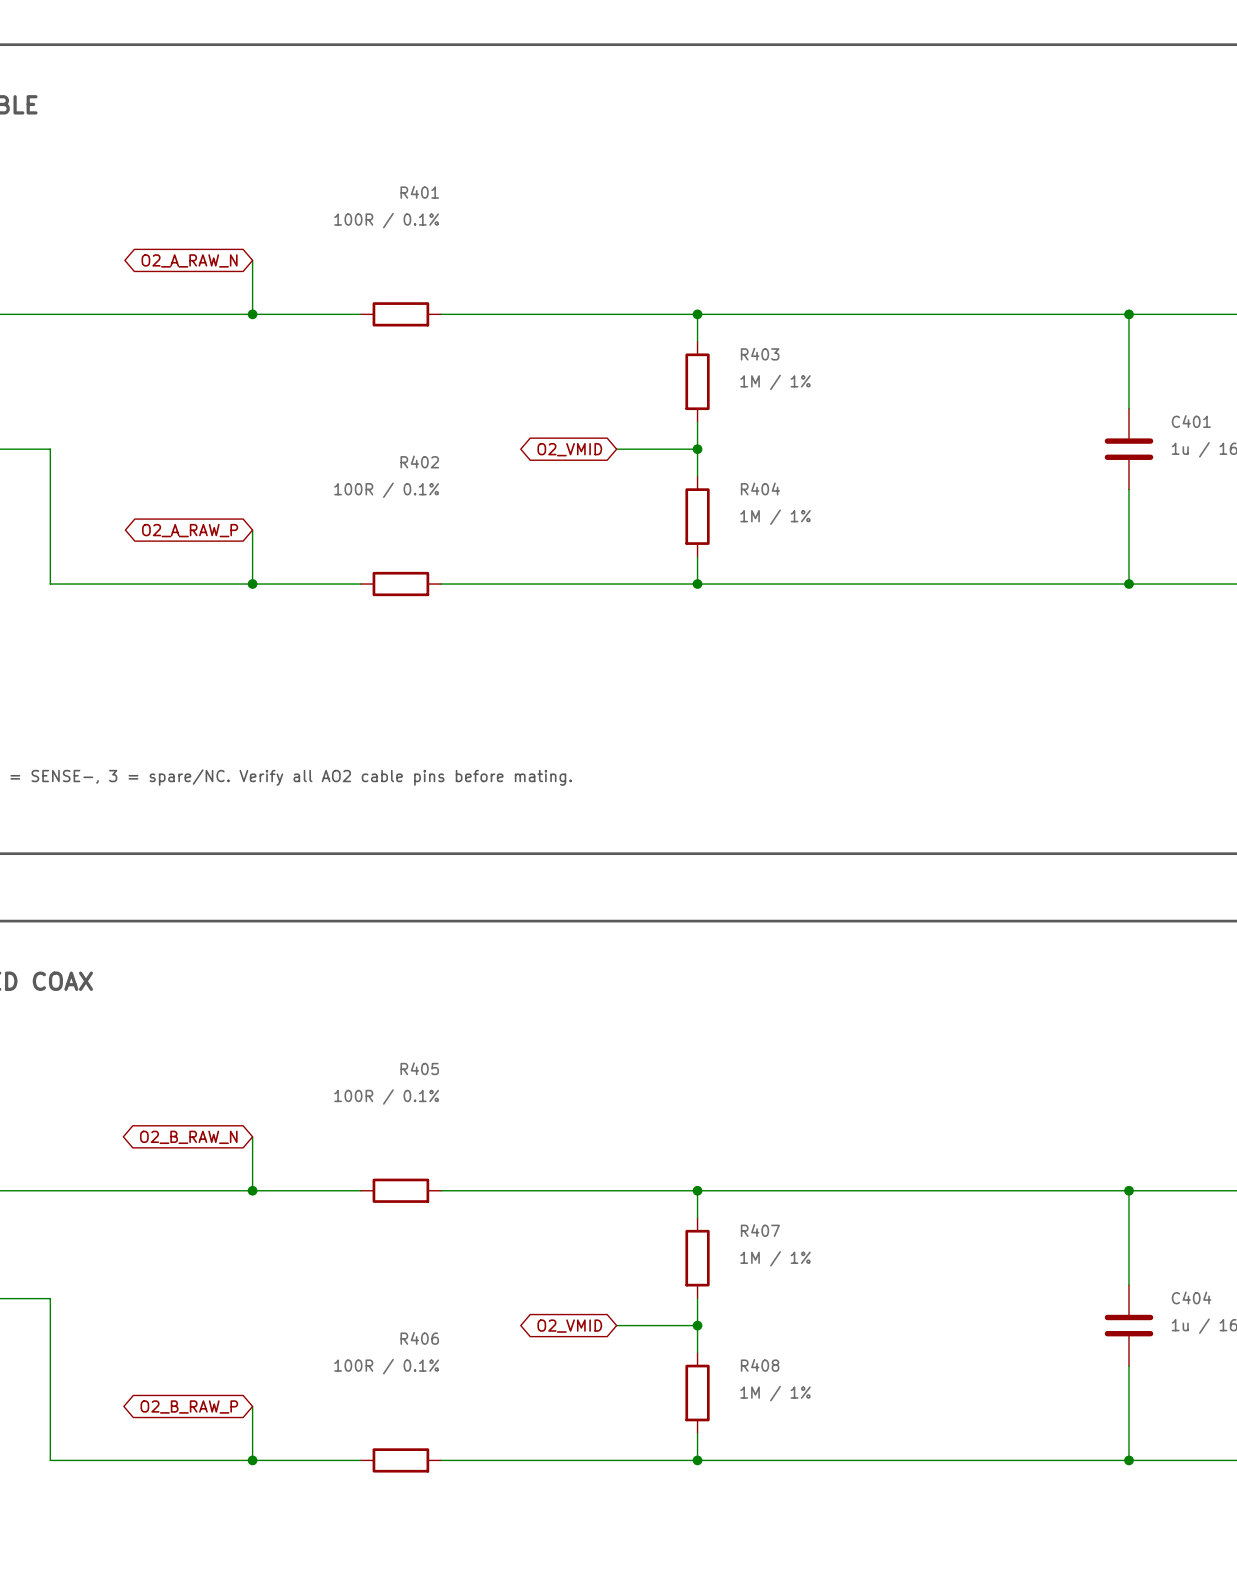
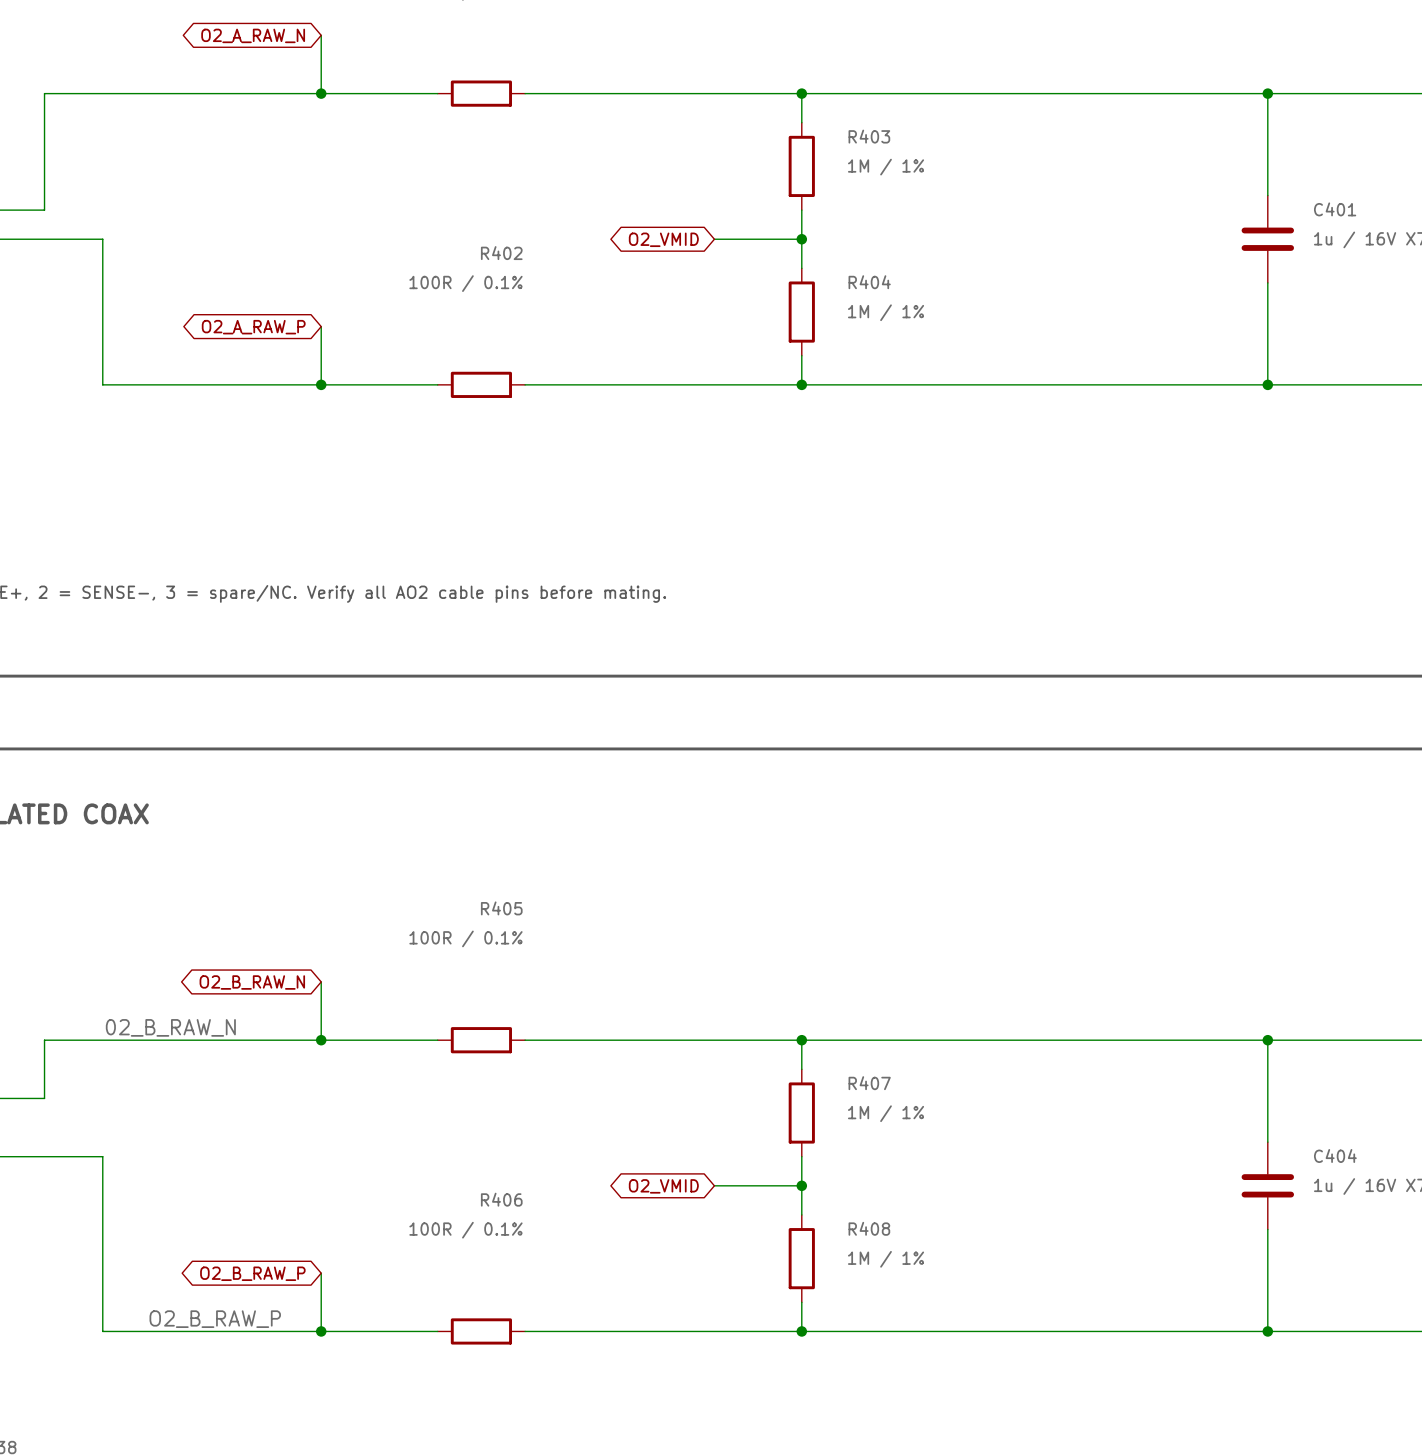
label: none -> 02_B_RAW_N (170, 1027)
label: none -> O2_B_RAW_P (215, 1319)

